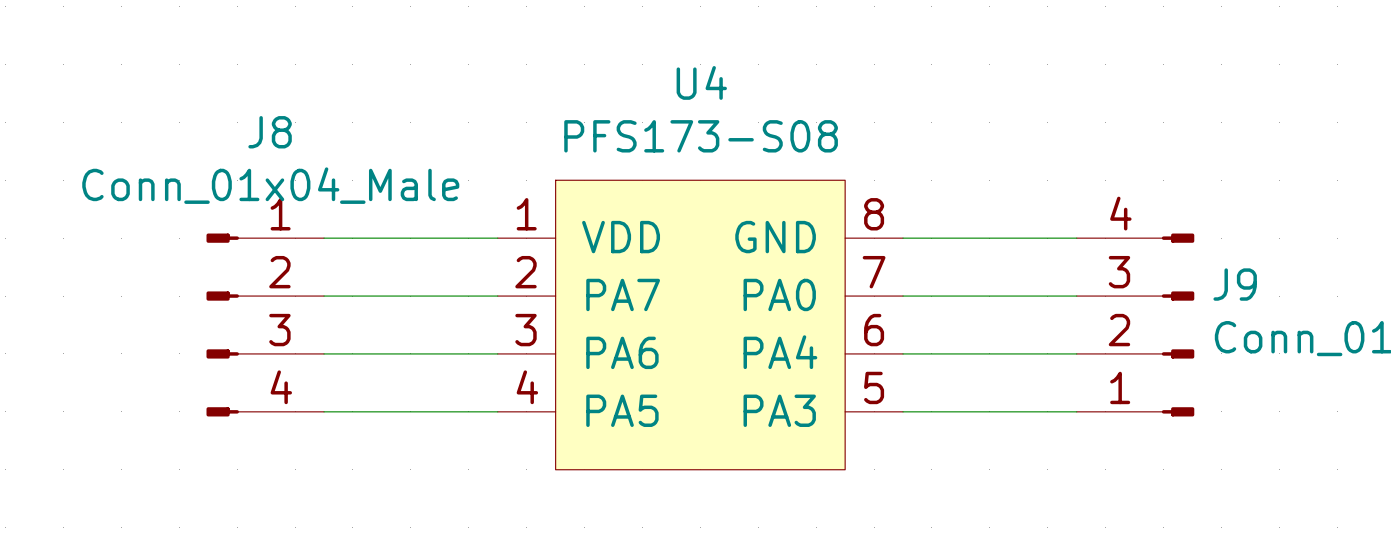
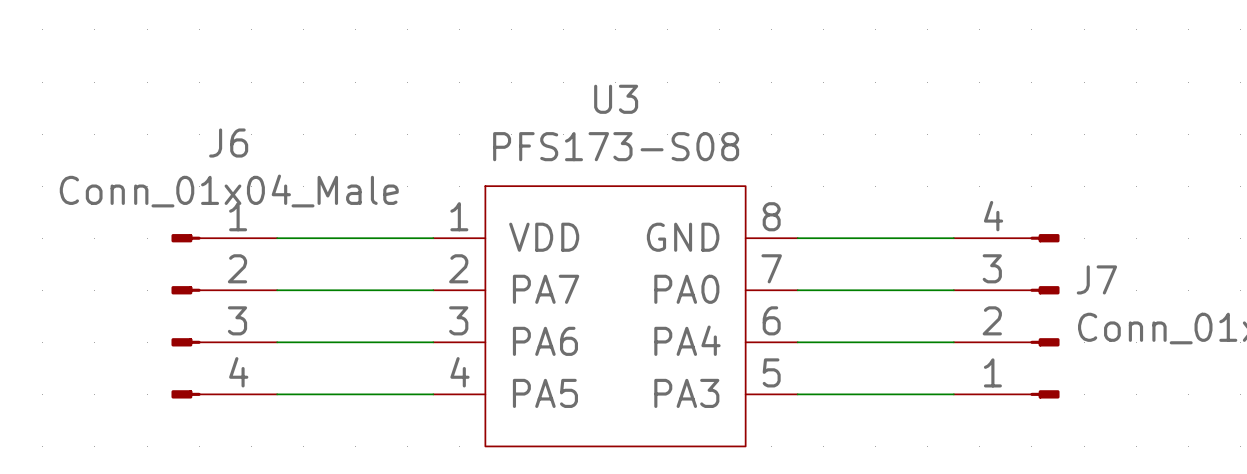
U4 name: U4 (701, 82) -> U3 (616, 99)
J8 name: J8 (270, 132) -> J6 (228, 143)
J9 name: J9 (1235, 284) -> J7 (1096, 279)

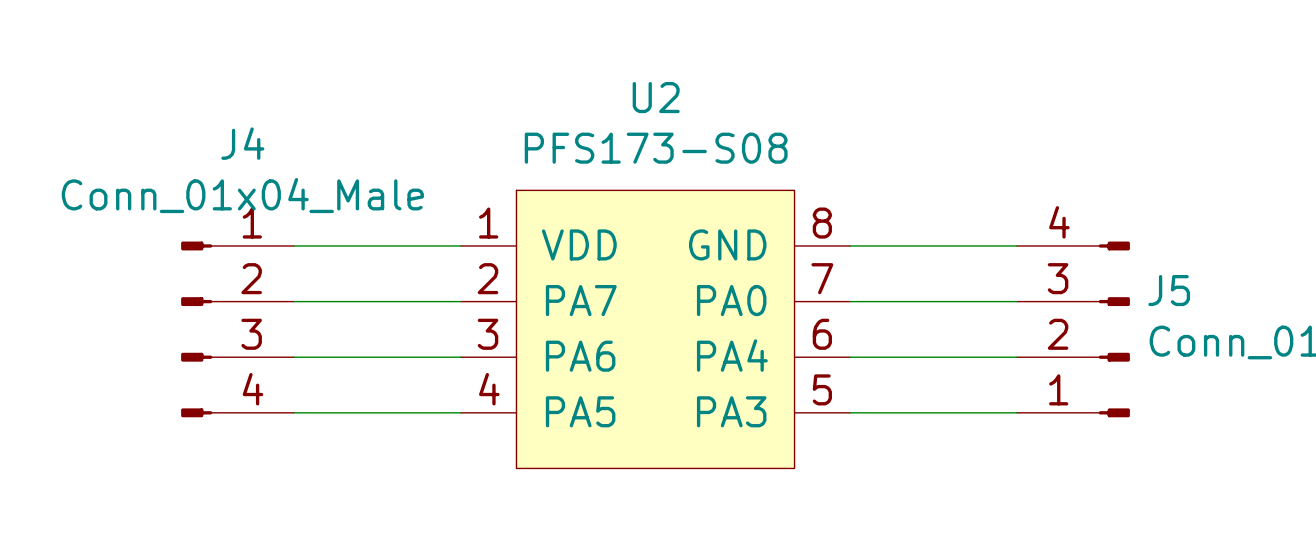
U3 name: U3 (616, 99) -> U2 (656, 97)
J6 name: J6 (228, 143) -> J4 (242, 143)
J7 name: J7 (1096, 279) -> J5 (1169, 290)

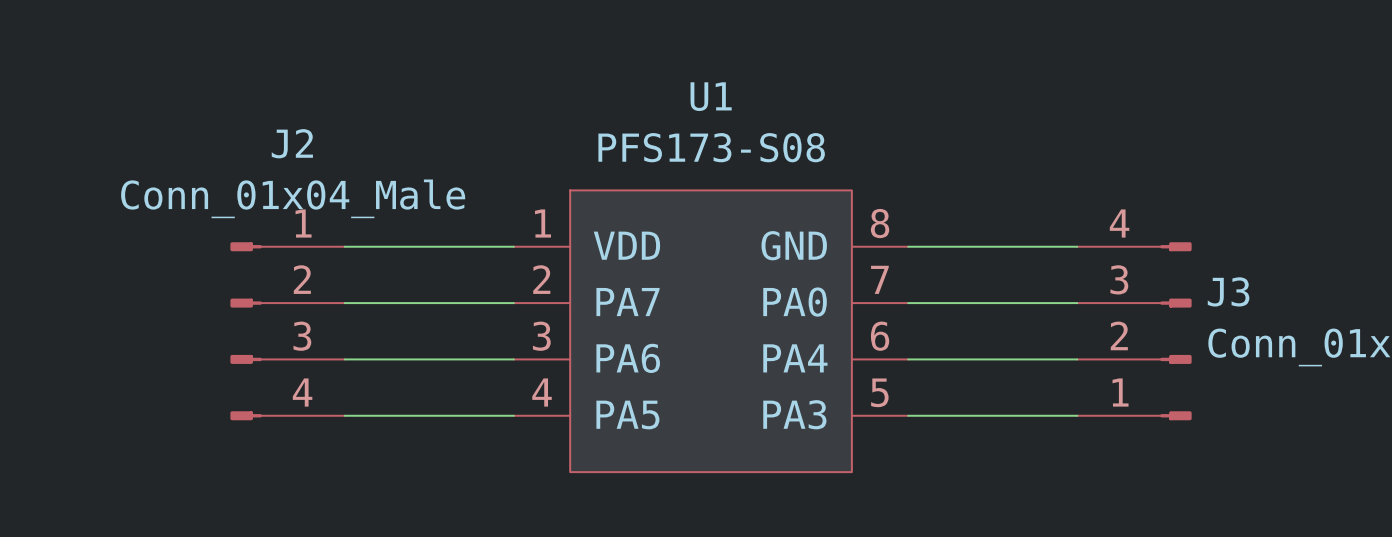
U2 name: U2 (656, 97) -> U1 (711, 96)
J4 name: J4 (242, 143) -> J2 (292, 143)
J5 name: J5 (1169, 290) -> J3 (1228, 291)

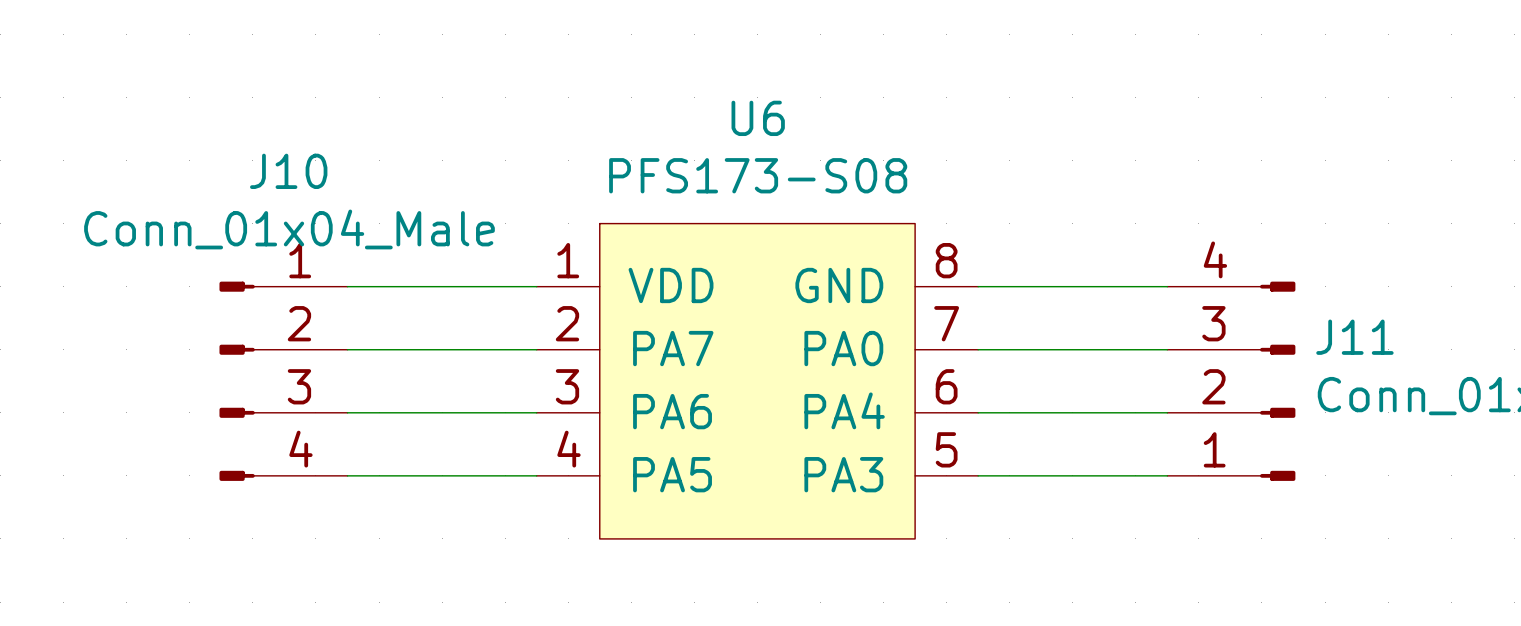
U1 name: U1 (711, 96) -> U6 (758, 118)
J2 name: J2 (292, 143) -> J10 (288, 171)
J3 name: J3 (1228, 291) -> J11 (1354, 337)

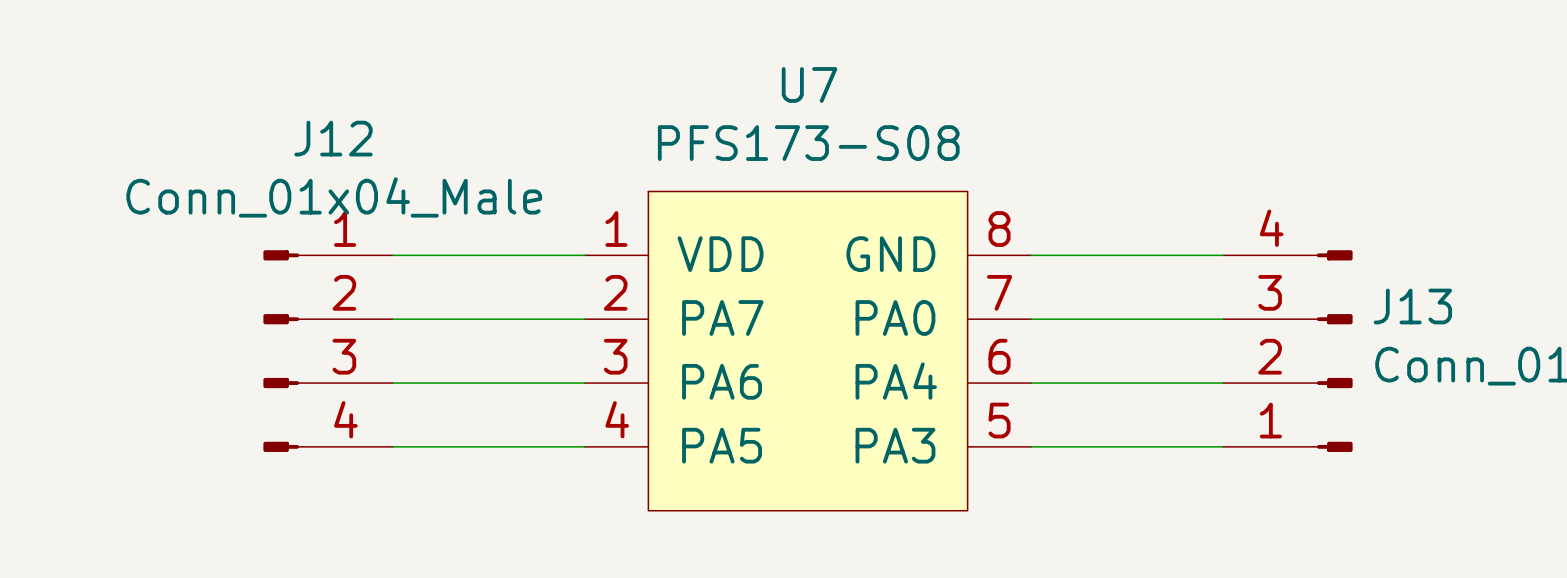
U6 name: U6 (758, 118) -> U7 (809, 84)
J10 name: J10 (288, 171) -> J12 (333, 138)
J11 name: J11 (1354, 337) -> J13 (1412, 306)

